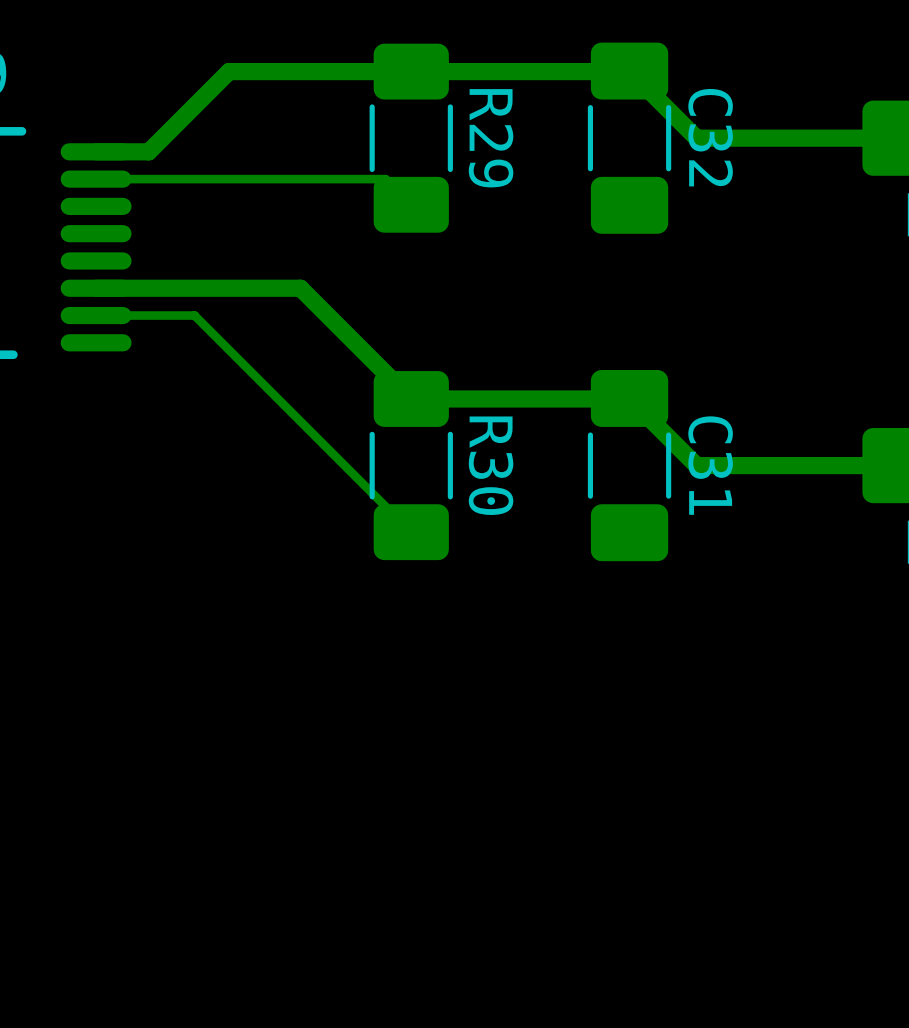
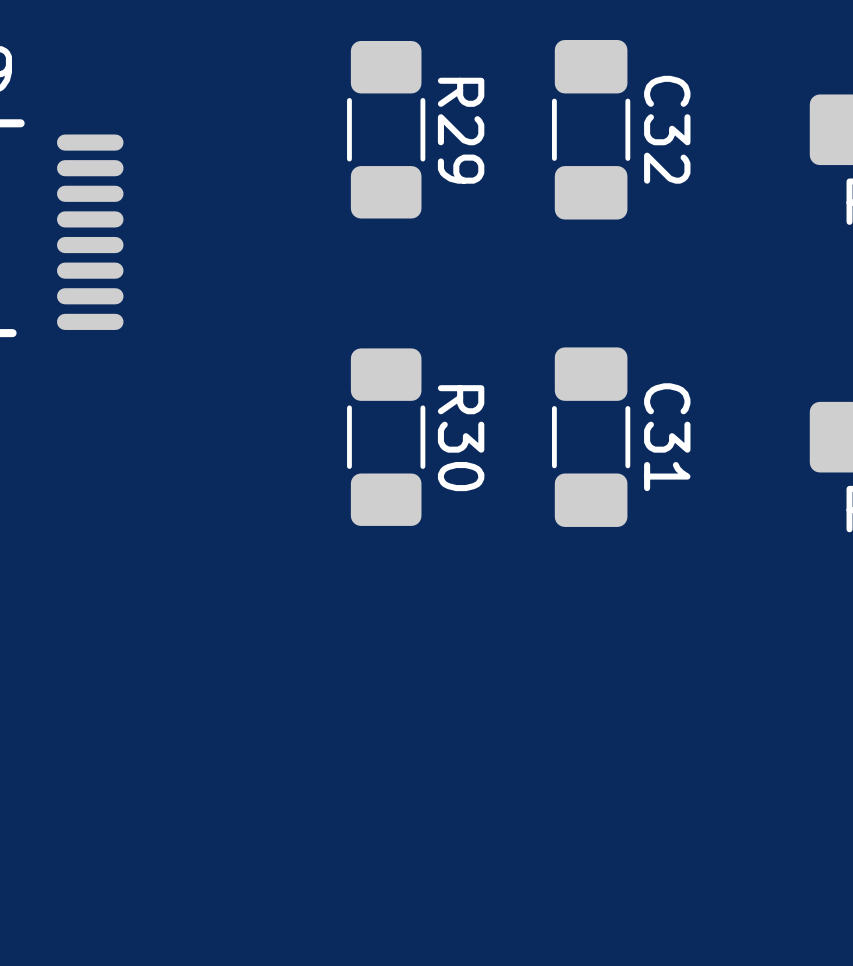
track: (629, 71) (696, 138) (890, 138) -> none
track: (629, 71) (229, 71) (148, 151) (96, 151) -> none
track: (96, 179) (385, 179) (411, 204) -> none
track: (96, 288) (300, 288) (411, 398) (629, 398) -> none
track: (96, 315) (194, 315) (411, 532) -> none
track: (629, 398) (696, 465) (890, 465) -> none

